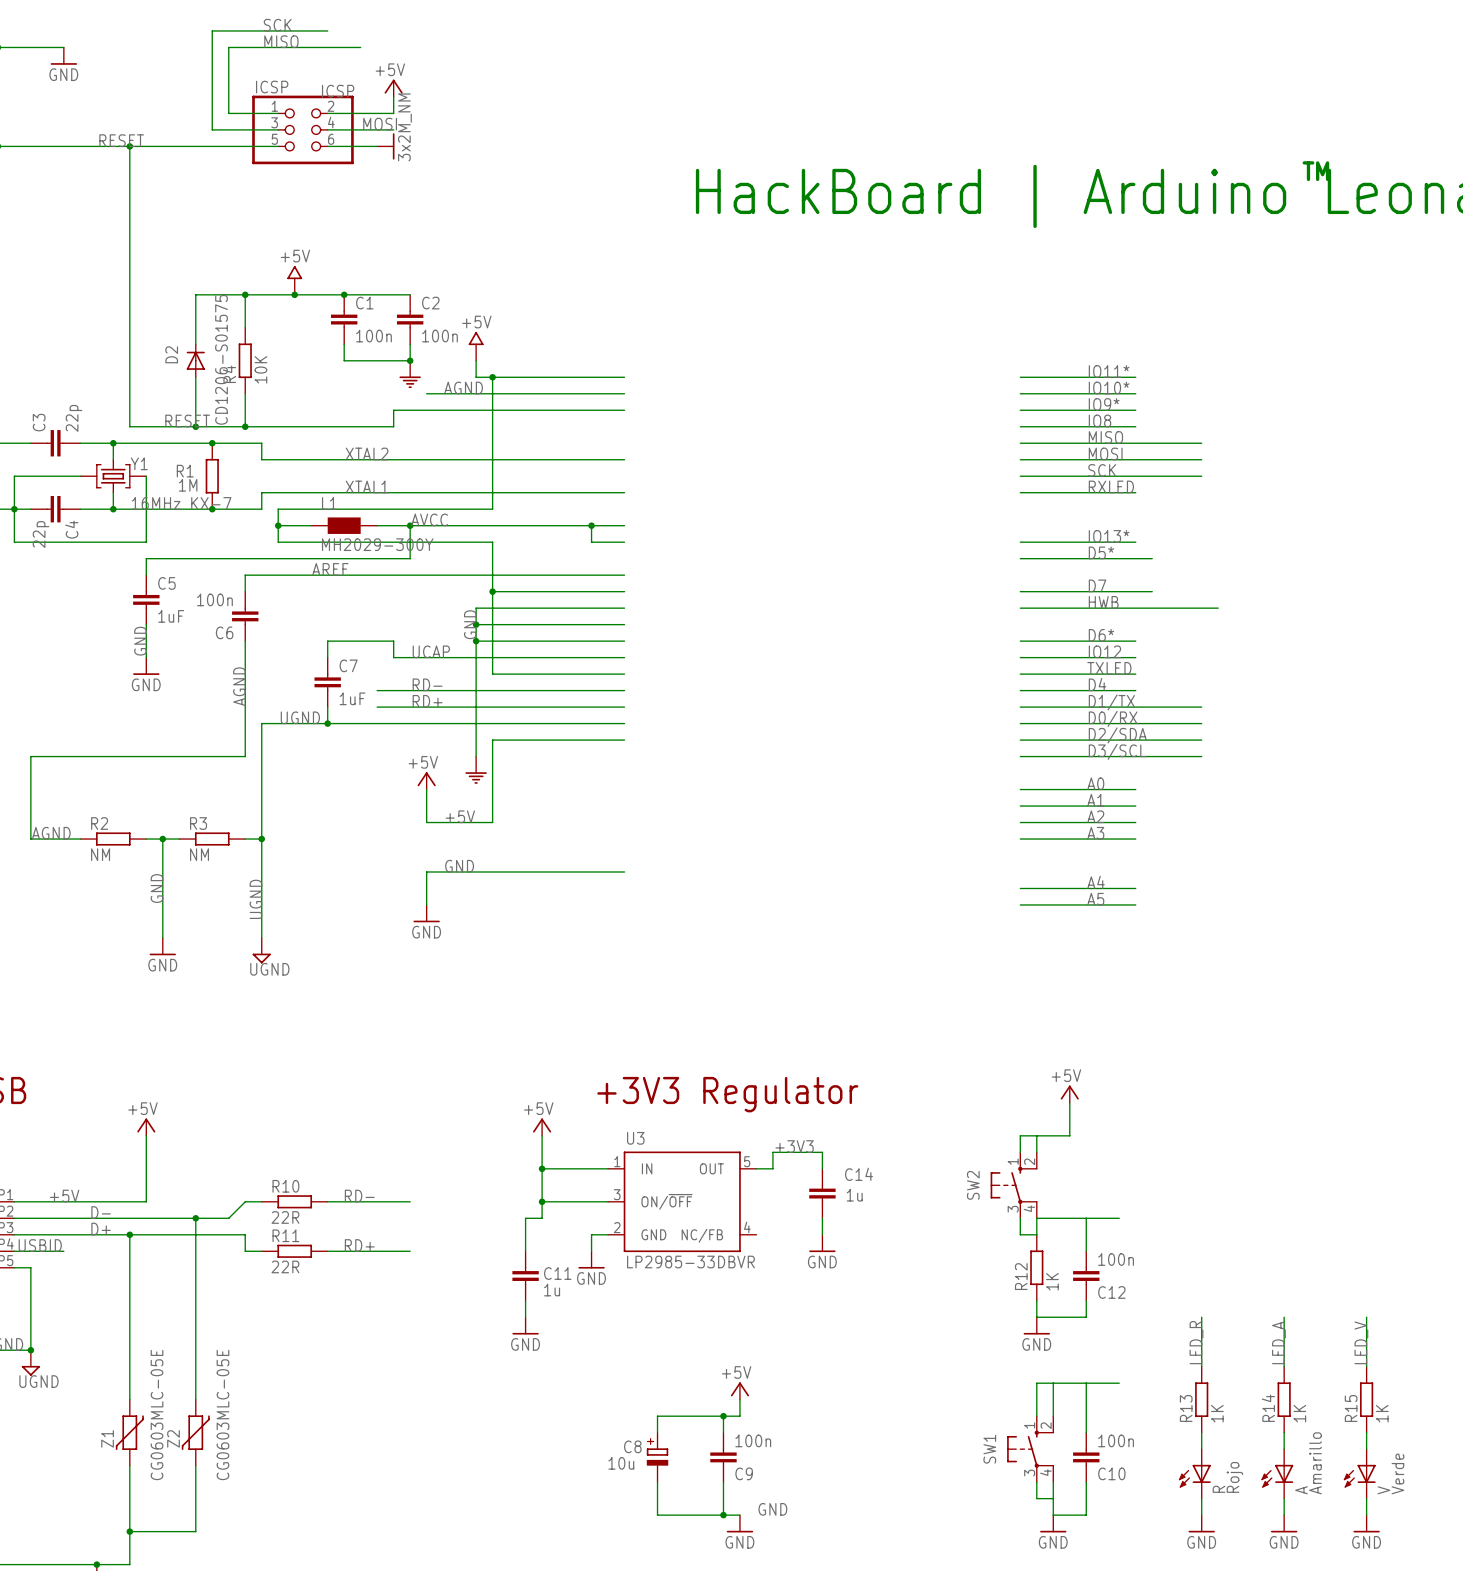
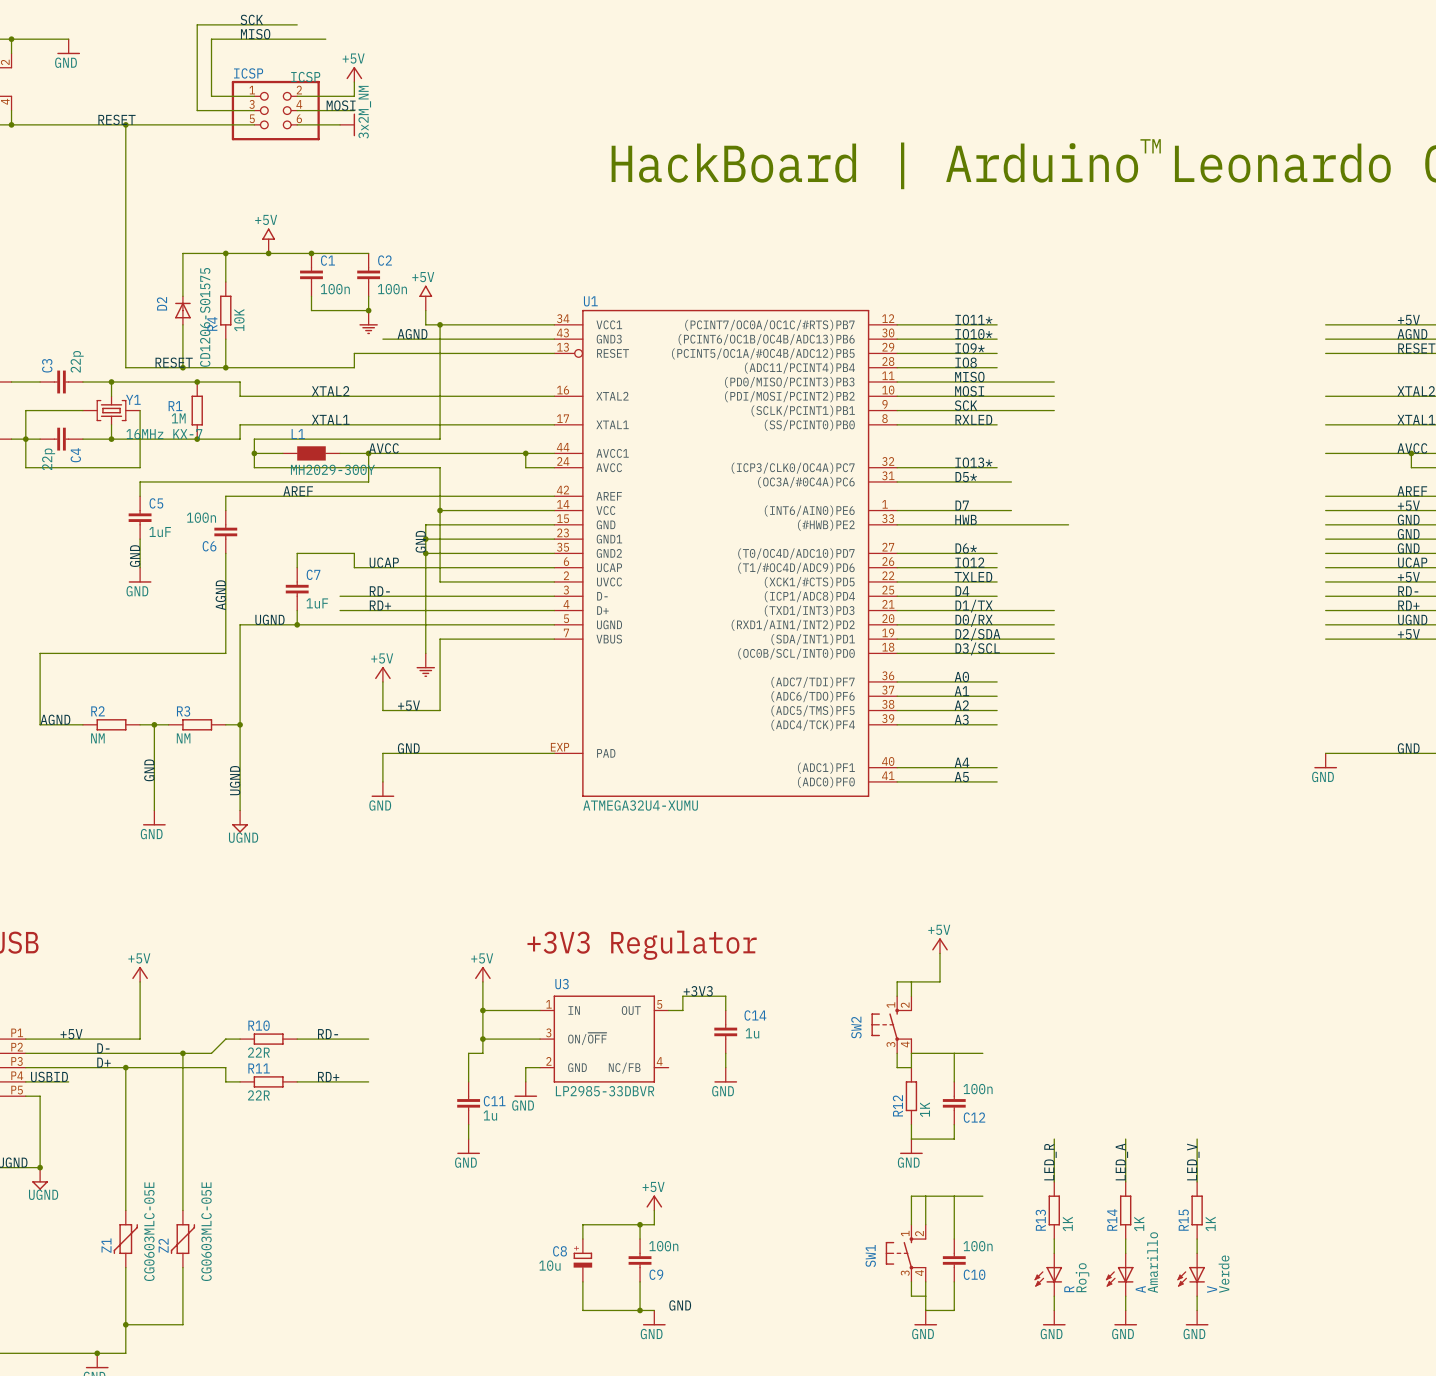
U1: none -> ATMEGA32U4-XUMU (725, 553)

